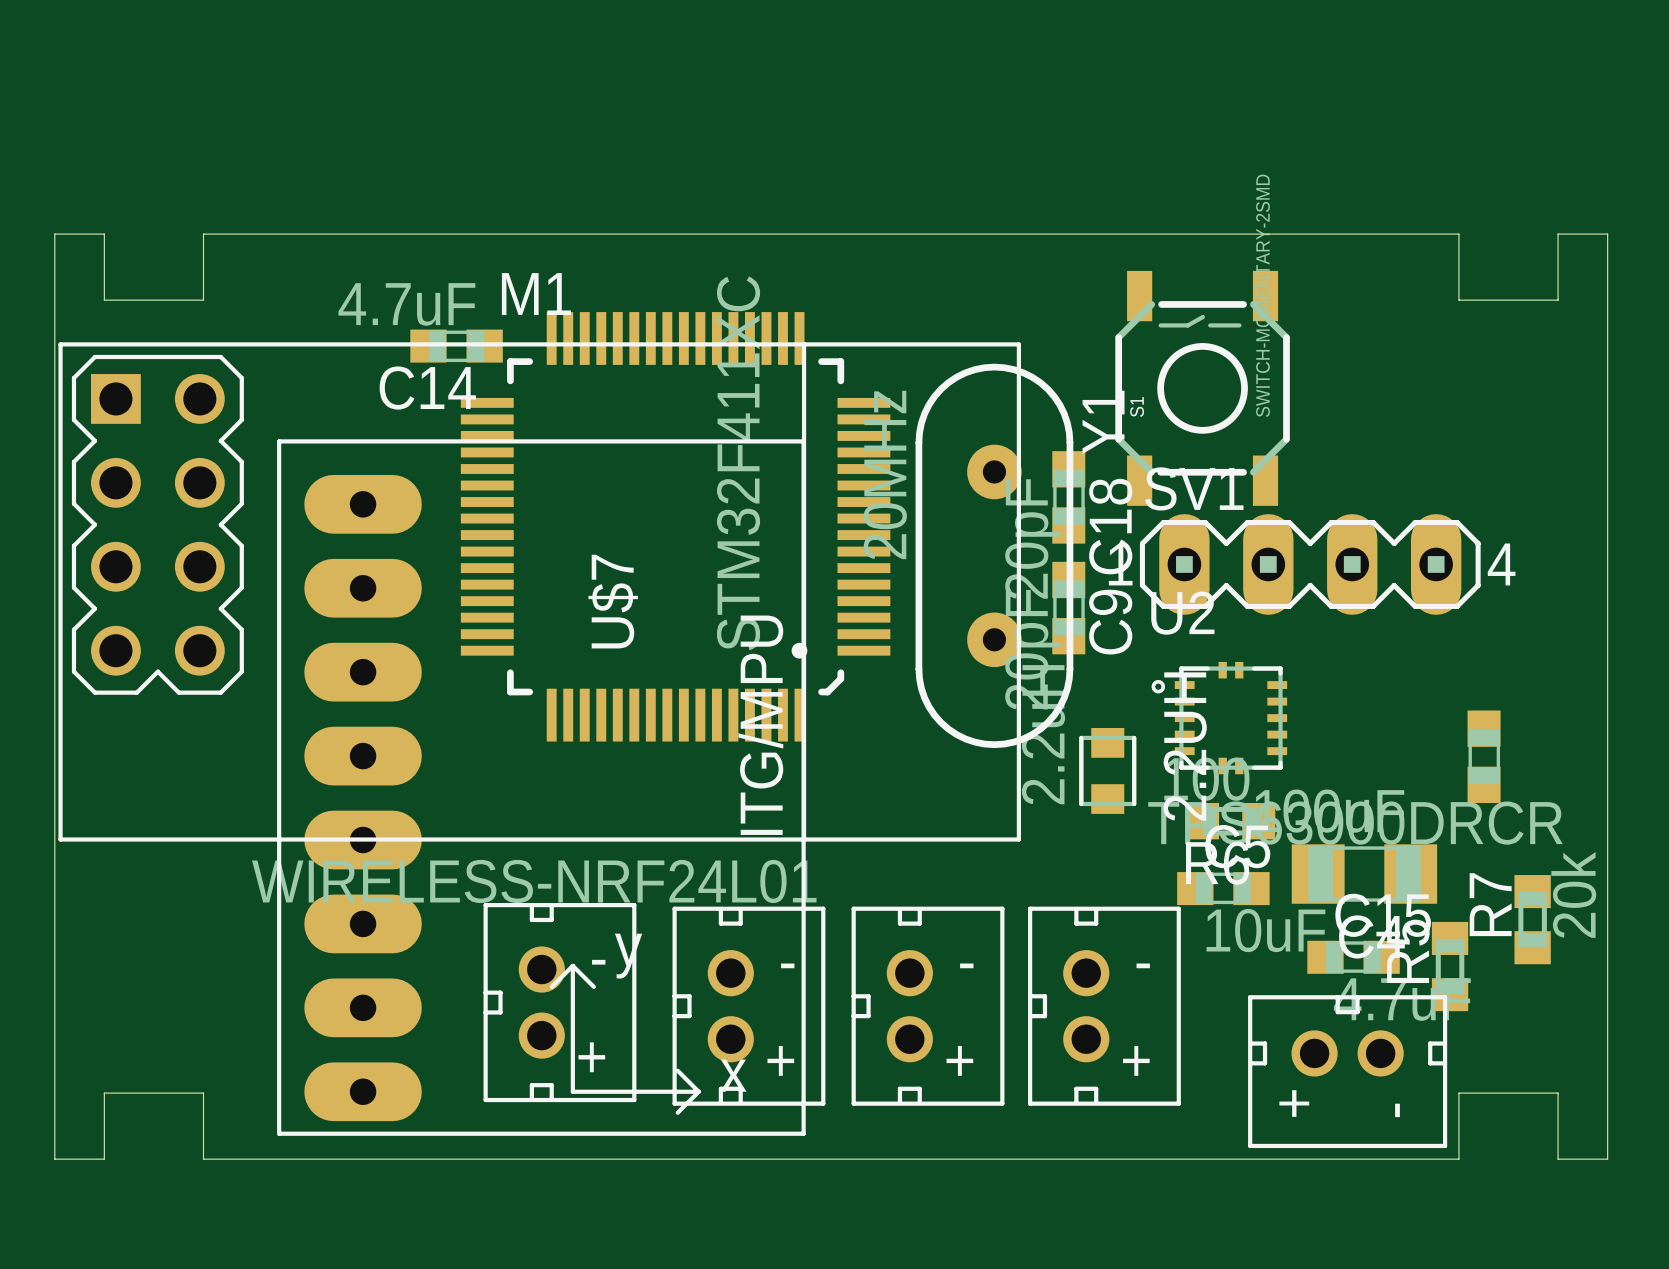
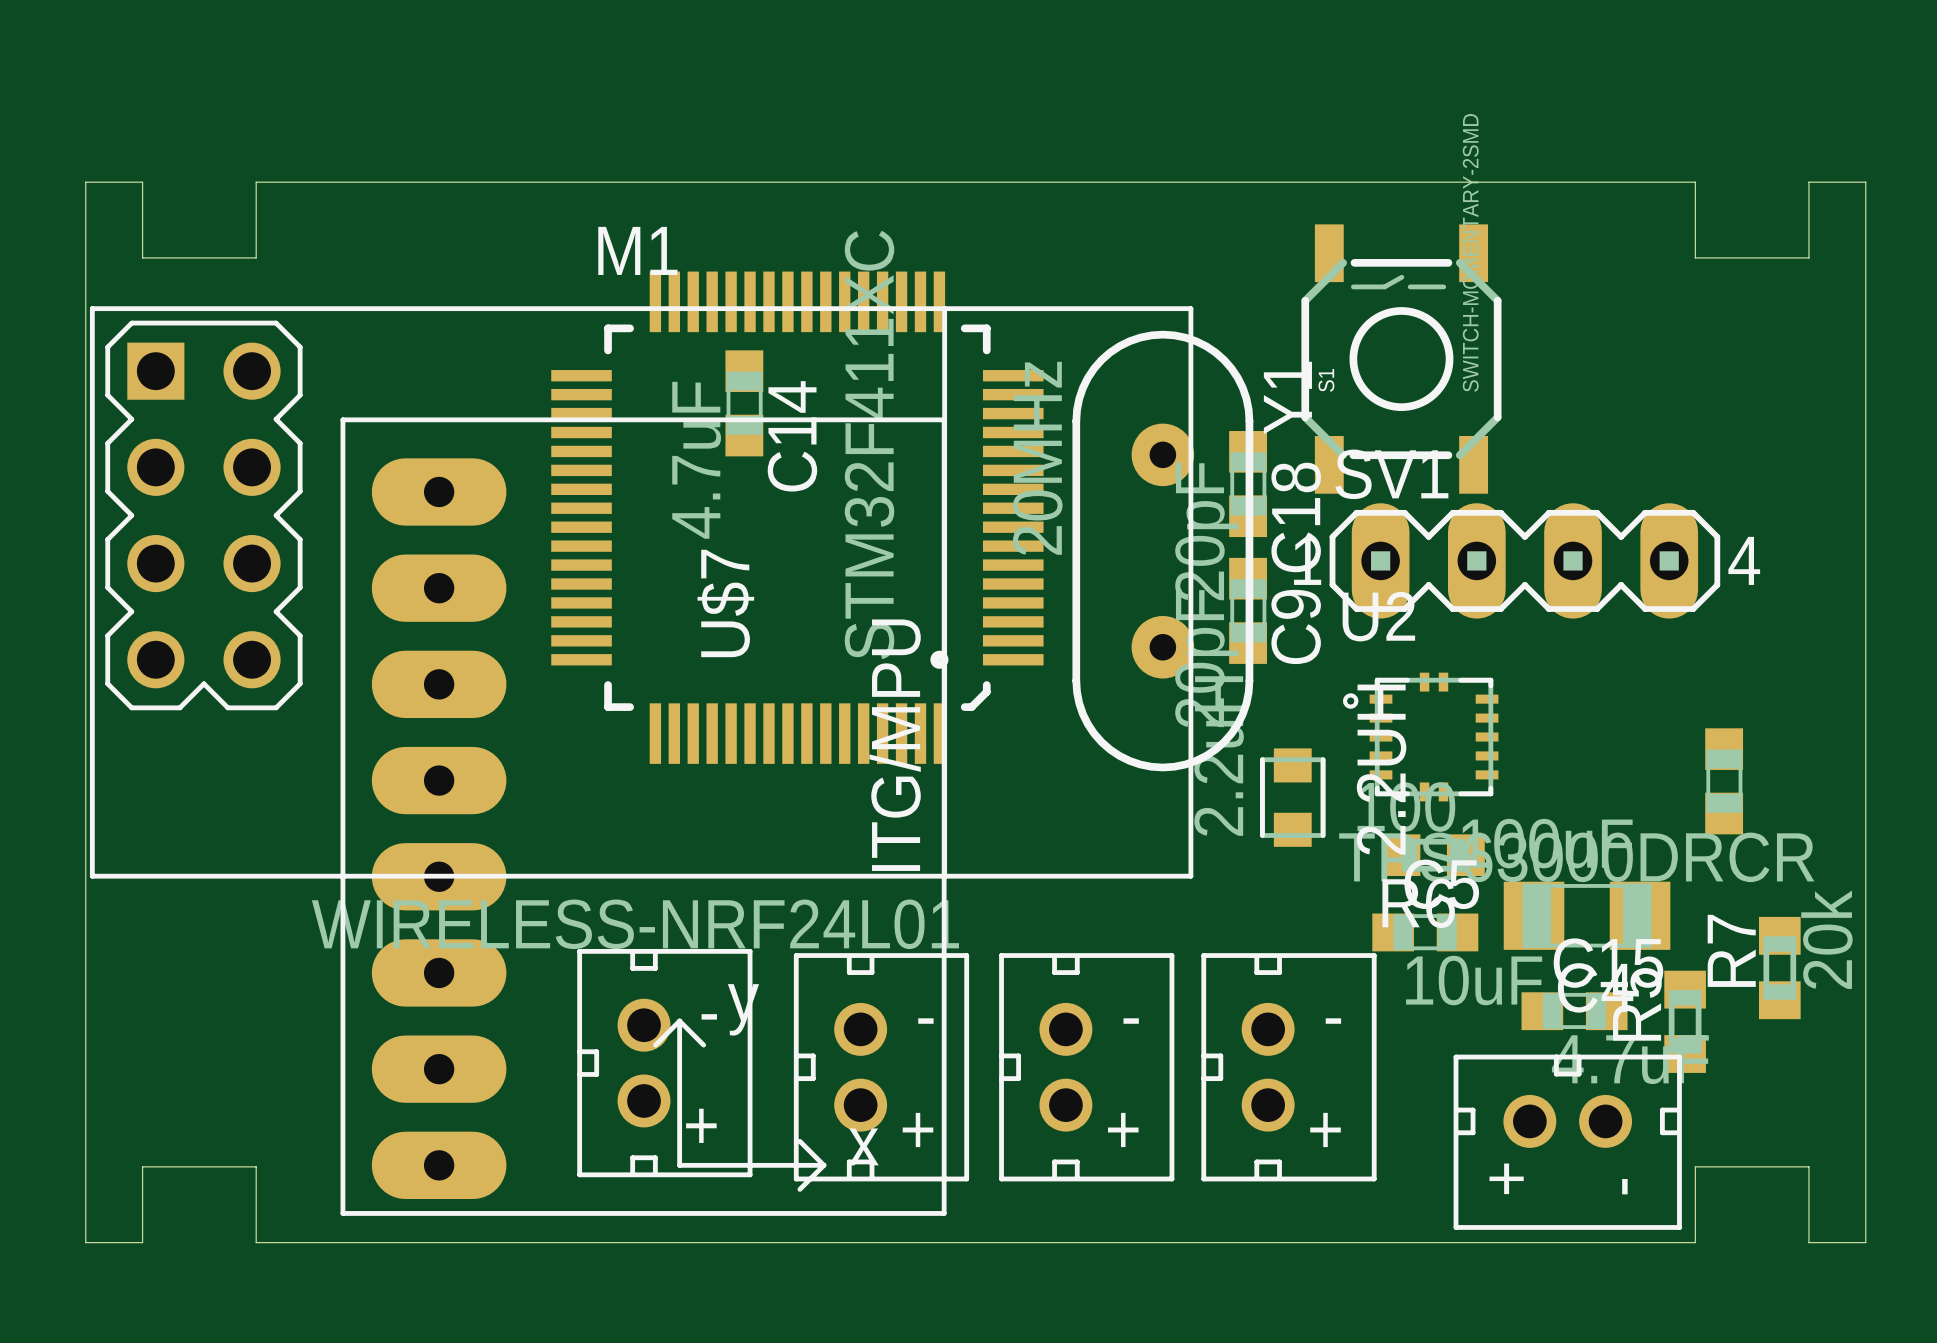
C14 value position: 4.7uF (406, 304) -> 4.7uF (696, 460)
C14 rotation: 0° (456, 346) -> 90° clockwise (744, 403)
C14 position: (456, 346) -> (744, 403)
C14 name position: C14 (427, 388) -> C14 (792, 436)

